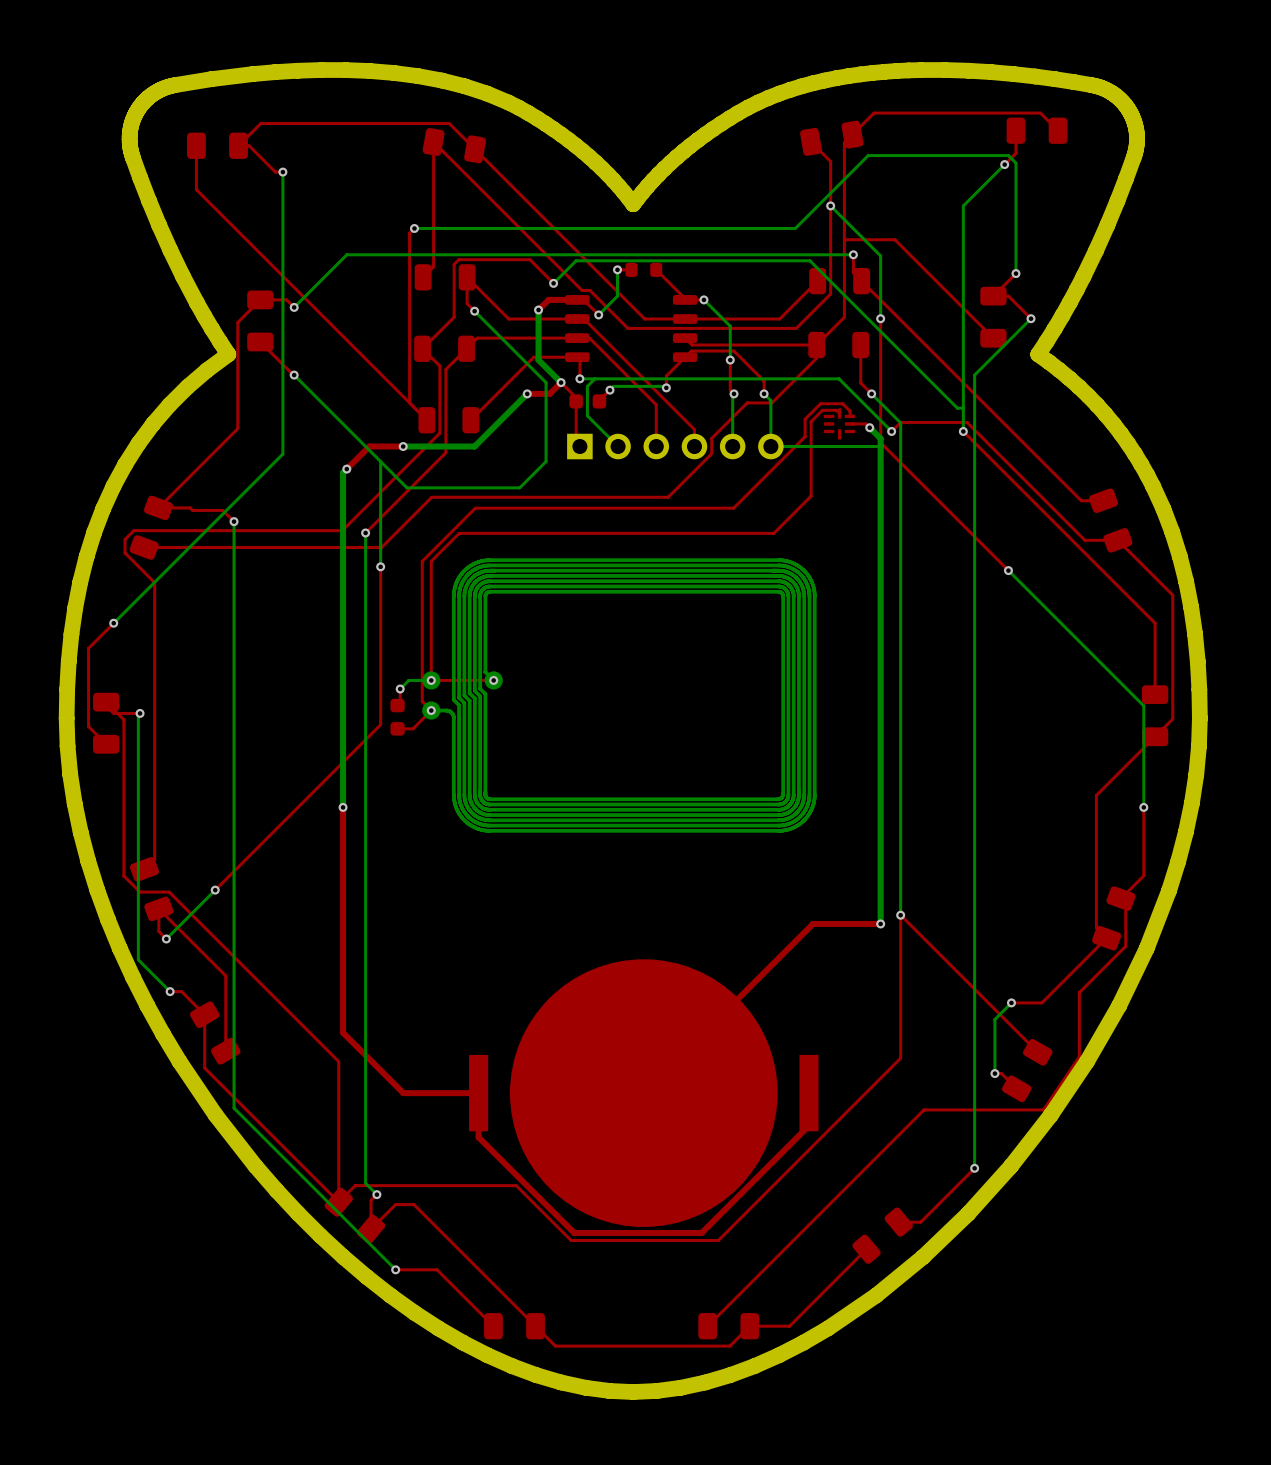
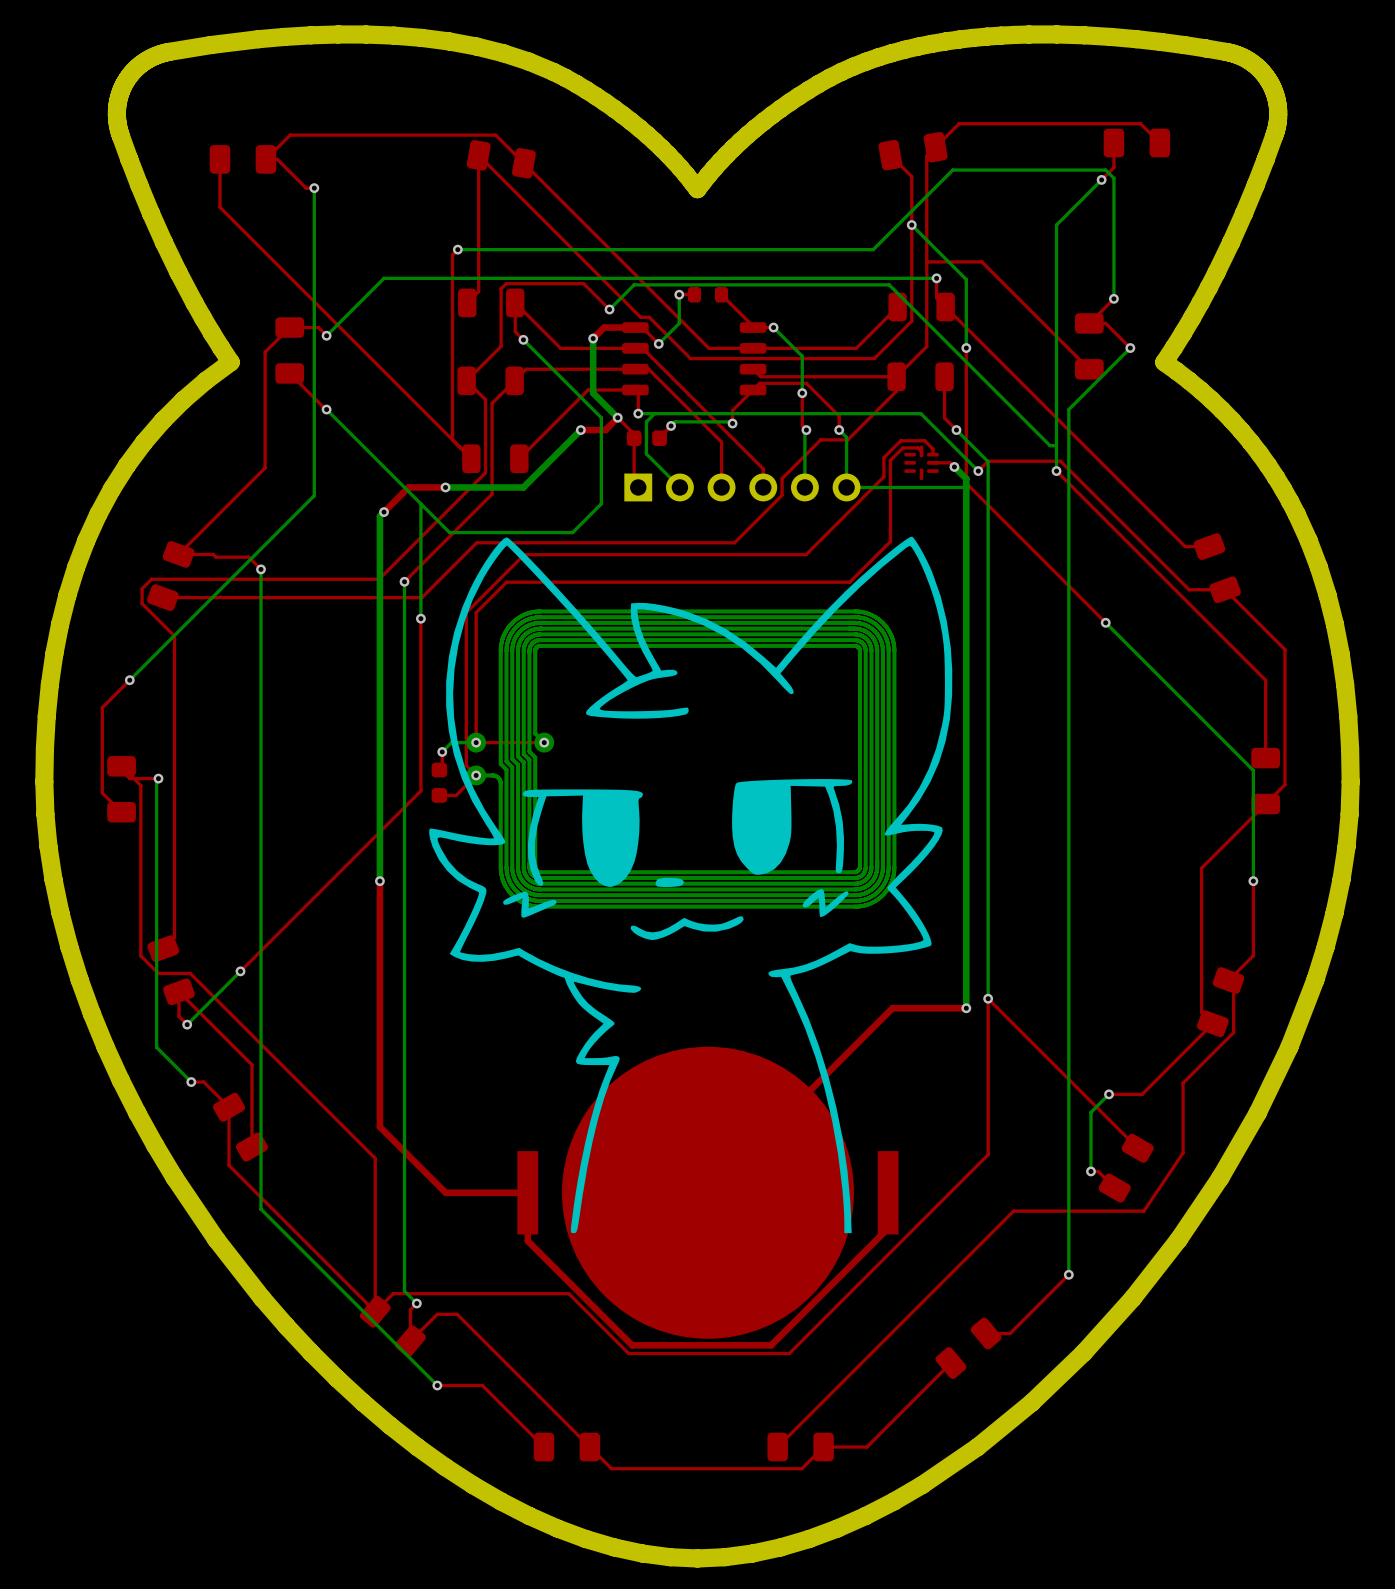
board edge: (944, 70) (1013, 74) (1097, 86) (1108, 91) (1120, 100) (1129, 111) (1135, 124) (1137, 139) (1134, 154) (1107, 225) (1076, 289) (1038, 354) (1088, 395) (1113, 423) (1134, 453) (1163, 508) (1172, 532) (1186, 581) (1197, 661) (1198, 746) (1191, 803) (1169, 890) (1146, 948) (1119, 1005) (1086, 1061) (1050, 1115) (1011, 1166) (968, 1213) (923, 1256) (876, 1295) (828, 1328) (779, 1355) (729, 1375) (705, 1382) (657, 1390) (633, 1392) (585, 1387) (536, 1375) (487, 1355) (414, 1312) (343, 1256) (276, 1190) (215, 1115) (162, 1033) (119, 948) (97, 890) (74, 803) (67, 746) (68, 661) (80, 581) (94, 532) (103, 508) (125, 464) (138, 443) (169, 404) (187, 387) (228, 354) (182, 276) (149, 200) (131, 151) (129, 136) (132, 122) (141, 104) (157, 91) (171, 85) (211, 79) (274, 72) (321, 70) (369, 71) (418, 76) (464, 86) (487, 93) (528, 113) (561, 134) (589, 157) (613, 180) (633, 204) (658, 174) (690, 145) (729, 118) (768, 97) (801, 86) (848, 76) (896, 71) (944, 70) -> (1056, 34) (1136, 39) (1232, 53) (1245, 58) (1259, 69) (1269, 82) (1276, 97) (1278, 114) (1275, 132) (1244, 213) (1208, 287) (1164, 362) (1188, 380) (1221, 410) (1250, 442) (1275, 477) (1308, 540) (1318, 567) (1334, 624) (1348, 716) (1350, 781) (1349, 814) (1341, 879) (1334, 913) (1315, 980) (1289, 1047) (1257, 1113) (1220, 1177) (1178, 1239) (1132, 1298) (1083, 1352) (1031, 1402) (977, 1447) (922, 1485) (865, 1516) (808, 1539) (780, 1547) (724, 1557) (697, 1558) (642, 1553) (586, 1539) (529, 1516) (501, 1501) (445, 1466) (363, 1402) (286, 1325) (216, 1239) (155, 1145) (105, 1047) (79, 980) (60, 913) (53, 879) (45, 814) (44, 781) (46, 716) (60, 624) (76, 567) (86, 540) (111, 489) (127, 465) (162, 420) (183, 399) (230, 362) (202, 317) (178, 272) (139, 185) (118, 128) (116, 110) (119, 94) (130, 74) (149, 59) (165, 52) (210, 45) (284, 36) (338, 34) (394, 35) (449, 41) (503, 53) (529, 61) (576, 84) (614, 108) (647, 134) (674, 161) (697, 189) (726, 154) (763, 121) (808, 90) (853, 66) (891, 53) (945, 41) (1001, 35) (1056, 34)
drawing: none -> [429, 536, 953, 1234]

